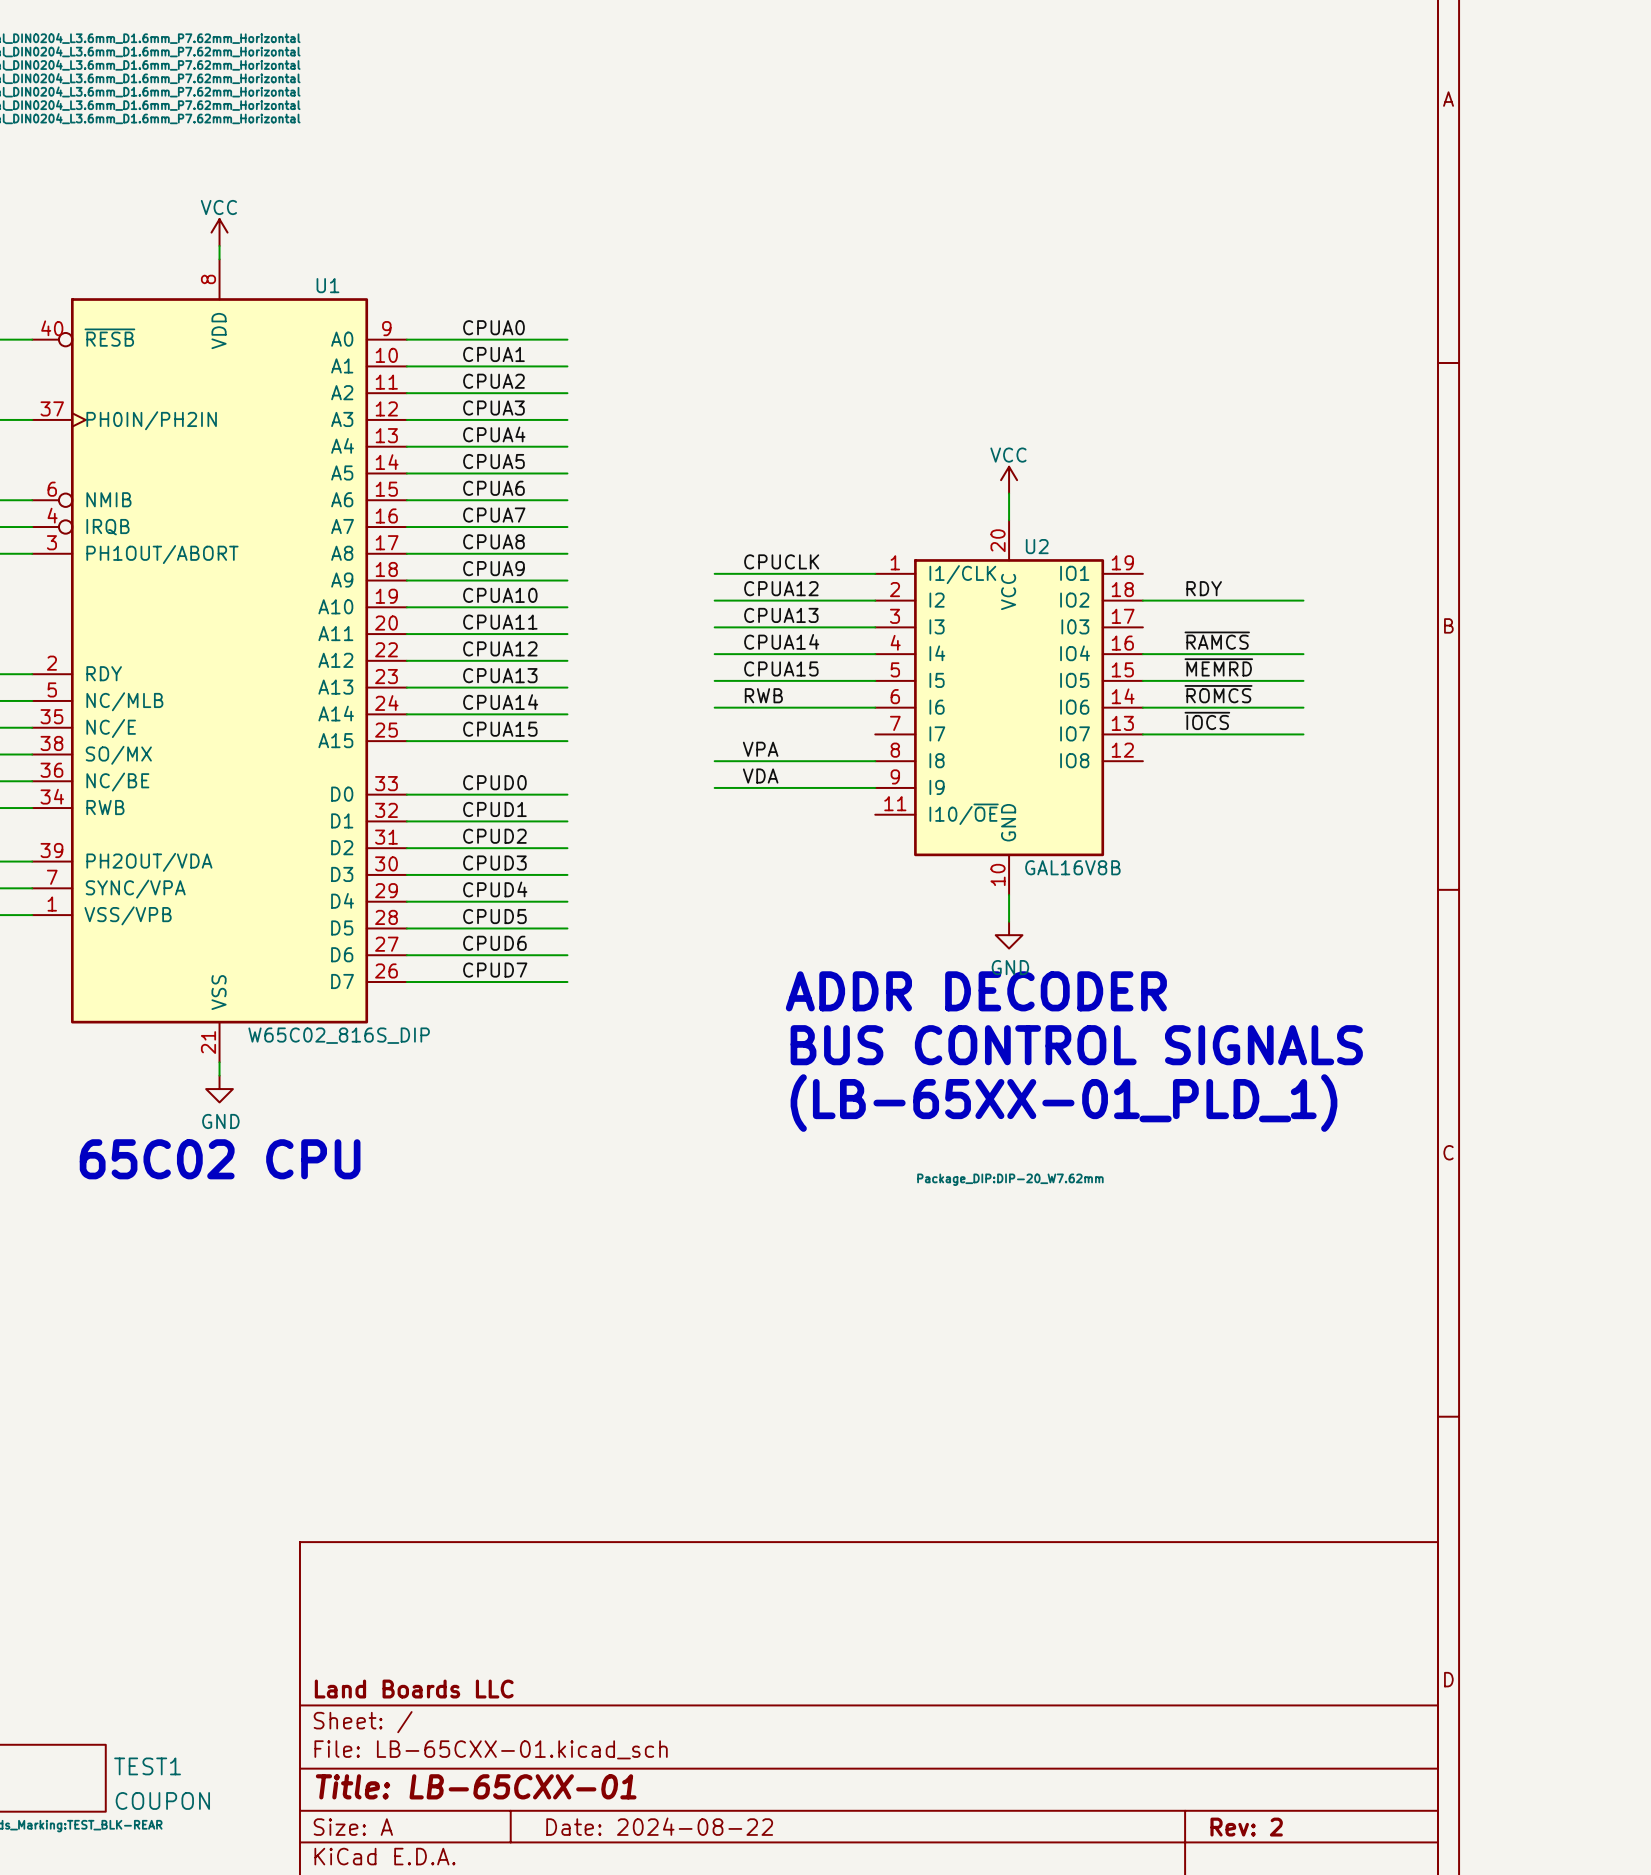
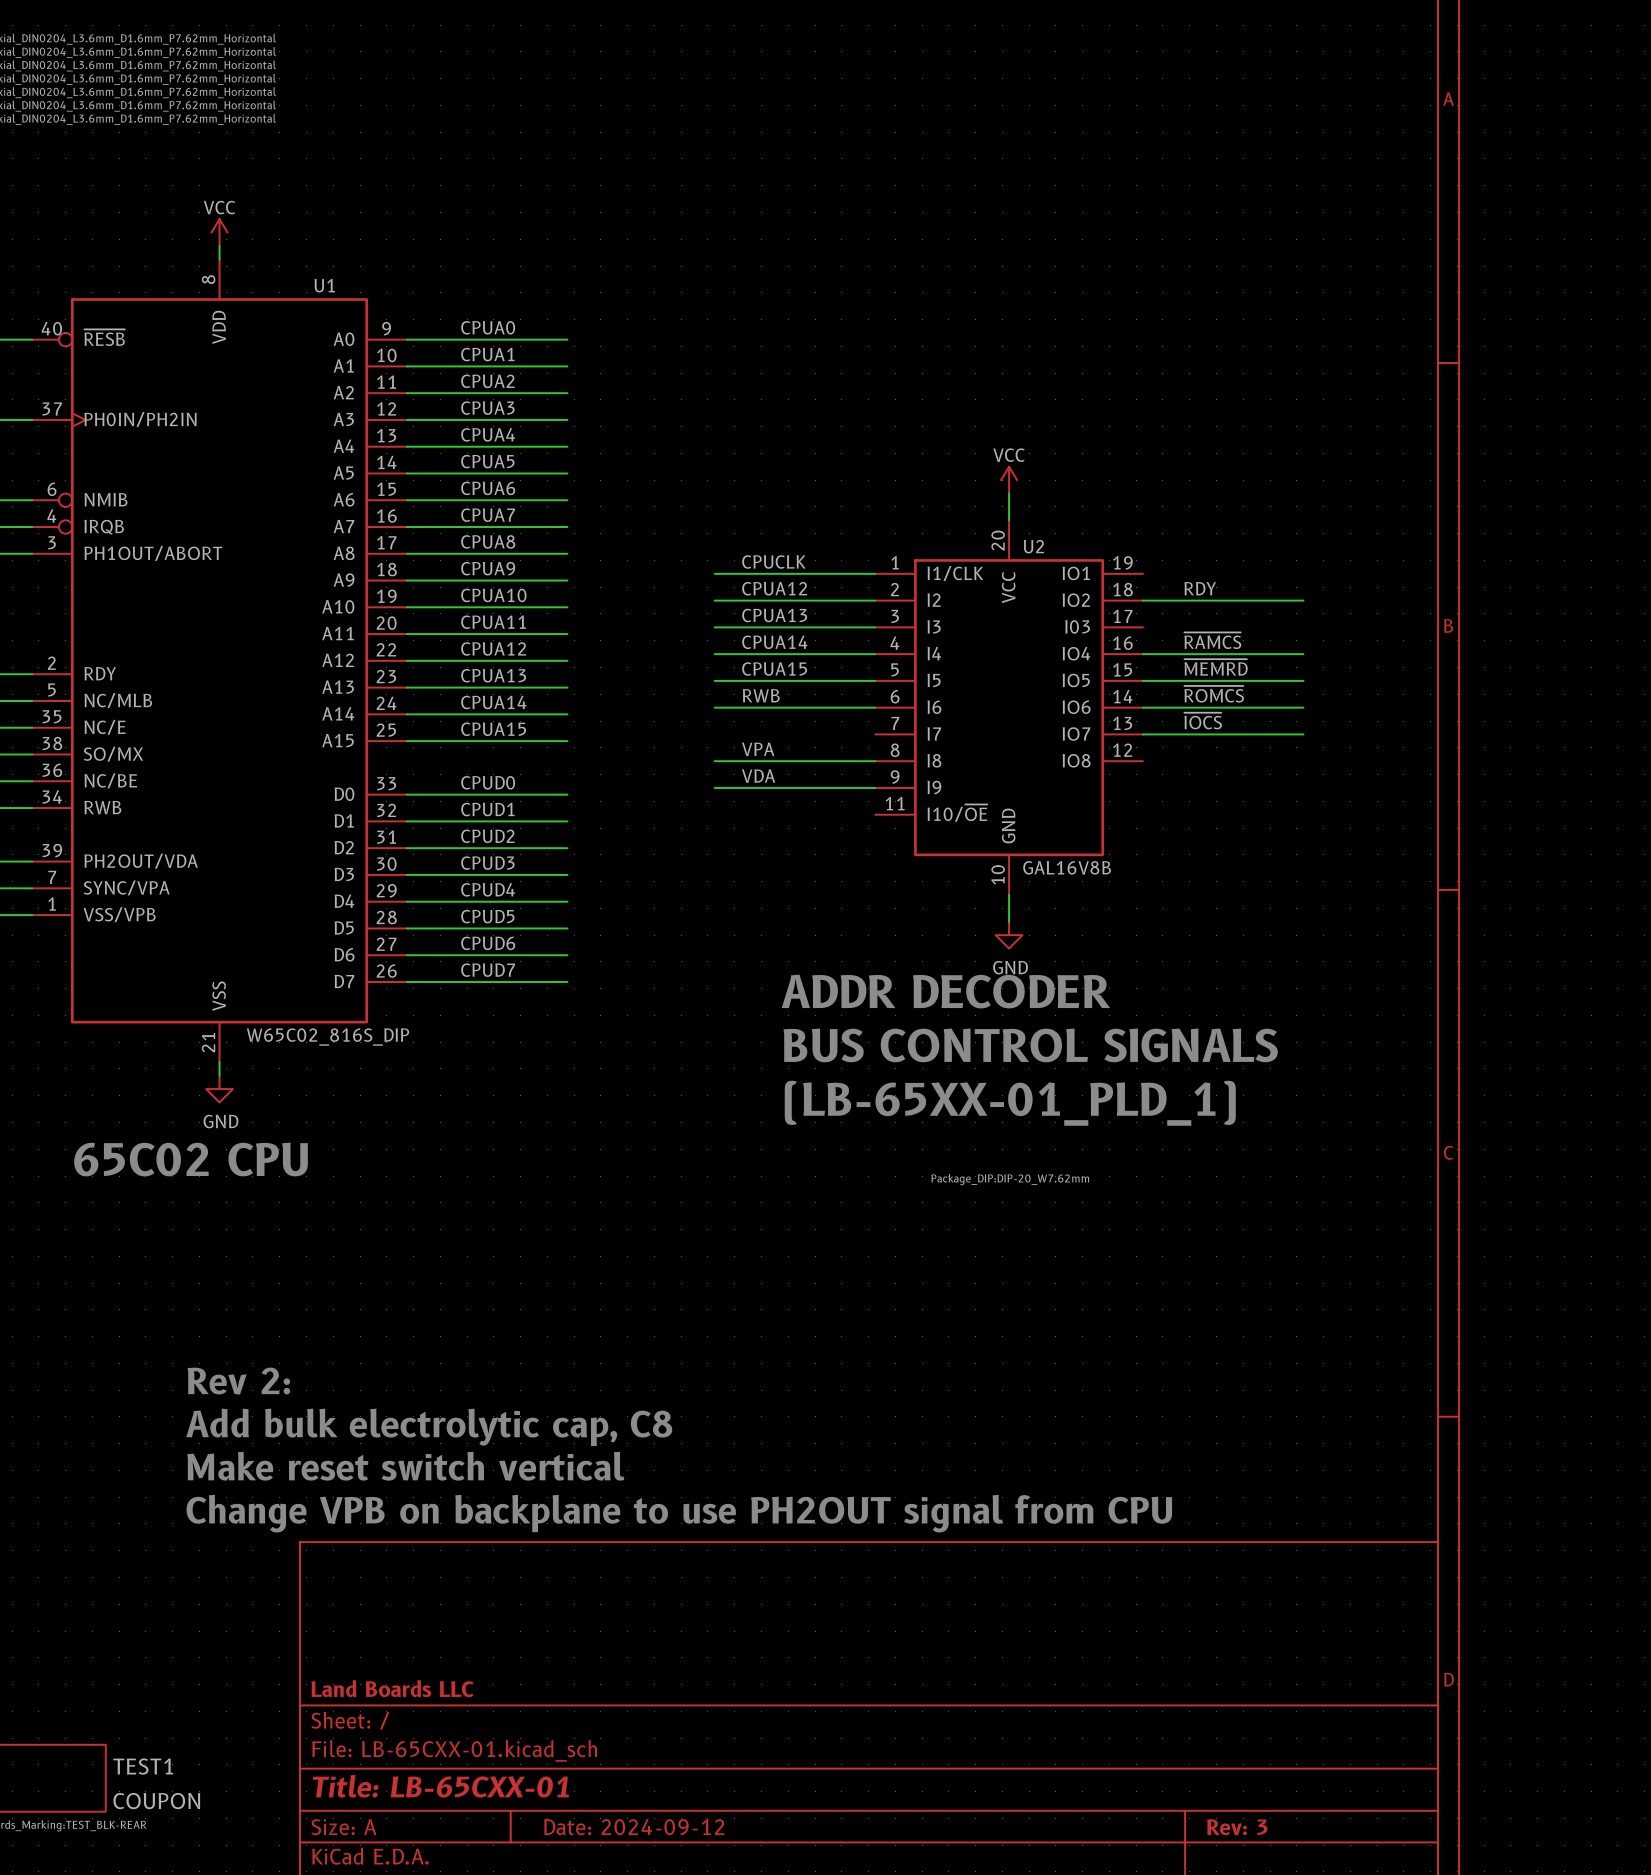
text: none -> Rev 2: (238, 1381)
text: none -> Add bulk electrolytic cap, C8 (429, 1427)
text: none -> Make reset switch vertical (405, 1466)
text: none -> Change VPB on backplane to use PH2OUT signal from CPU (679, 1513)
title block: Date: 2024-08-22 (659, 1826) -> Date: 2024-09-12 (634, 1827)
title block: Rev: 2 (1246, 1827) -> Rev: 3 (1237, 1827)

